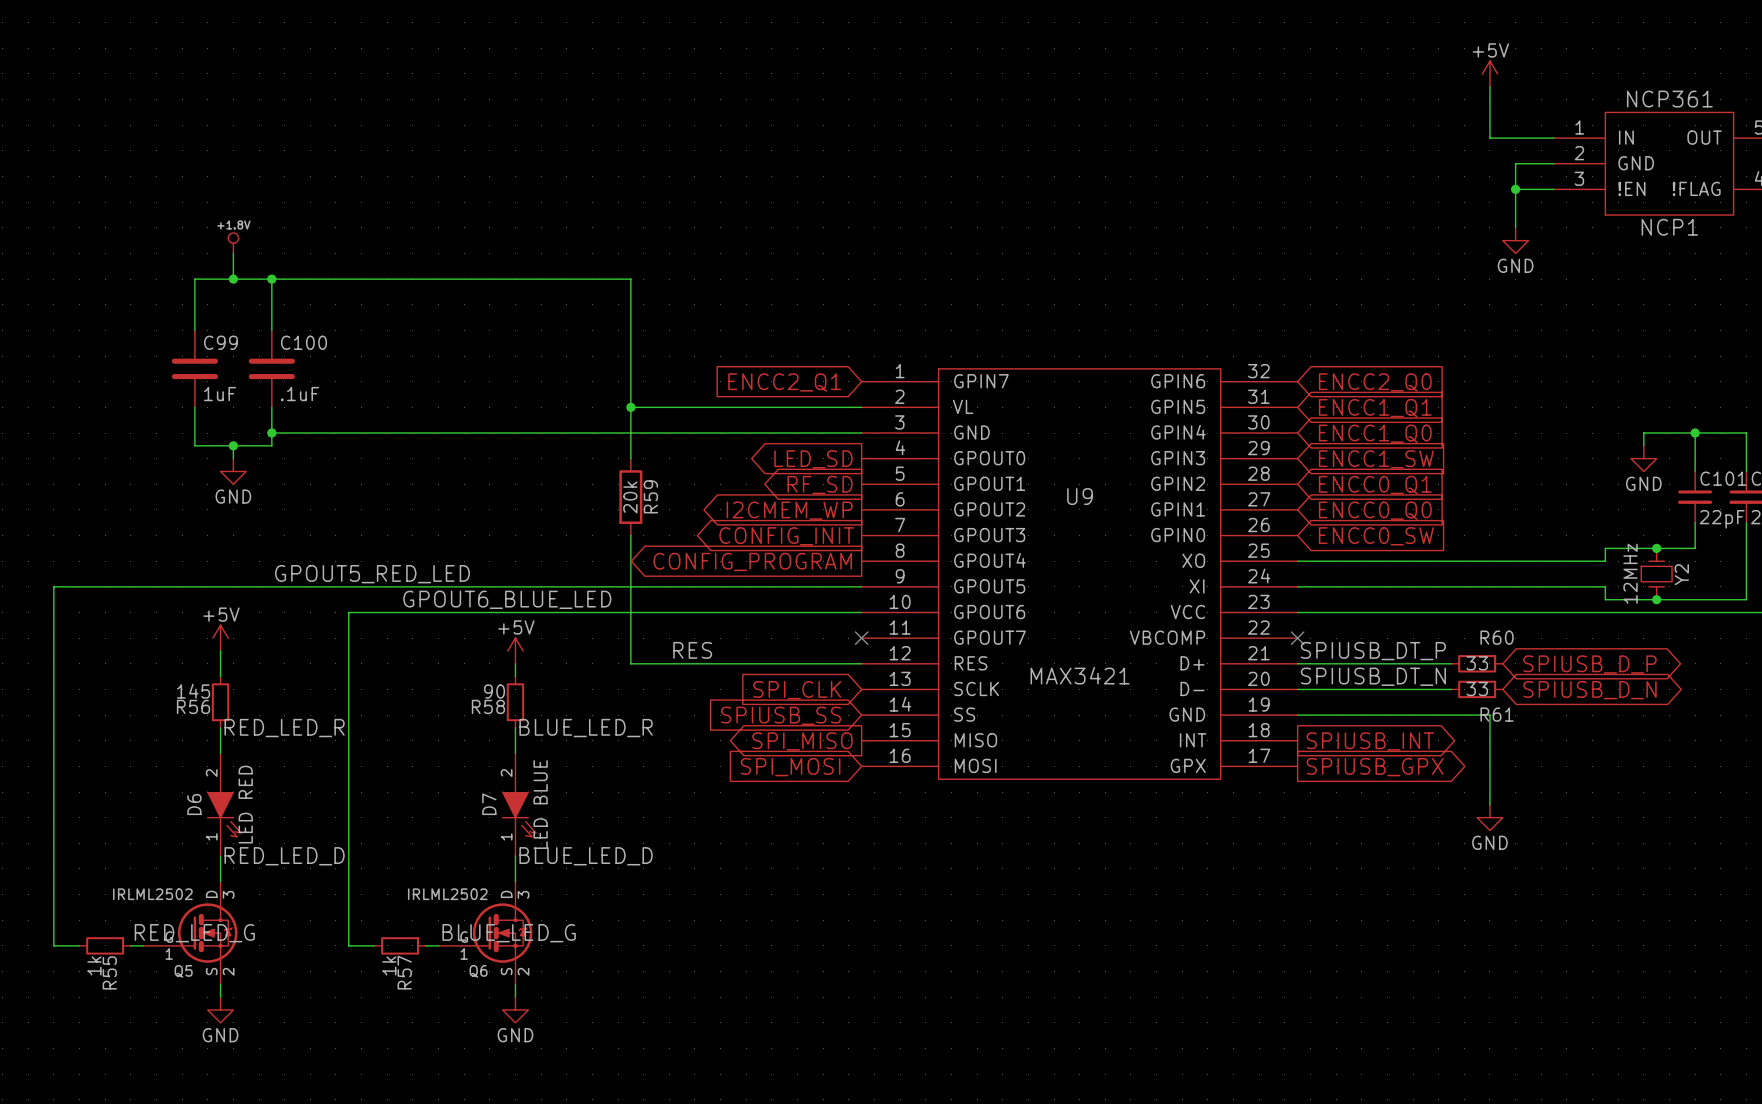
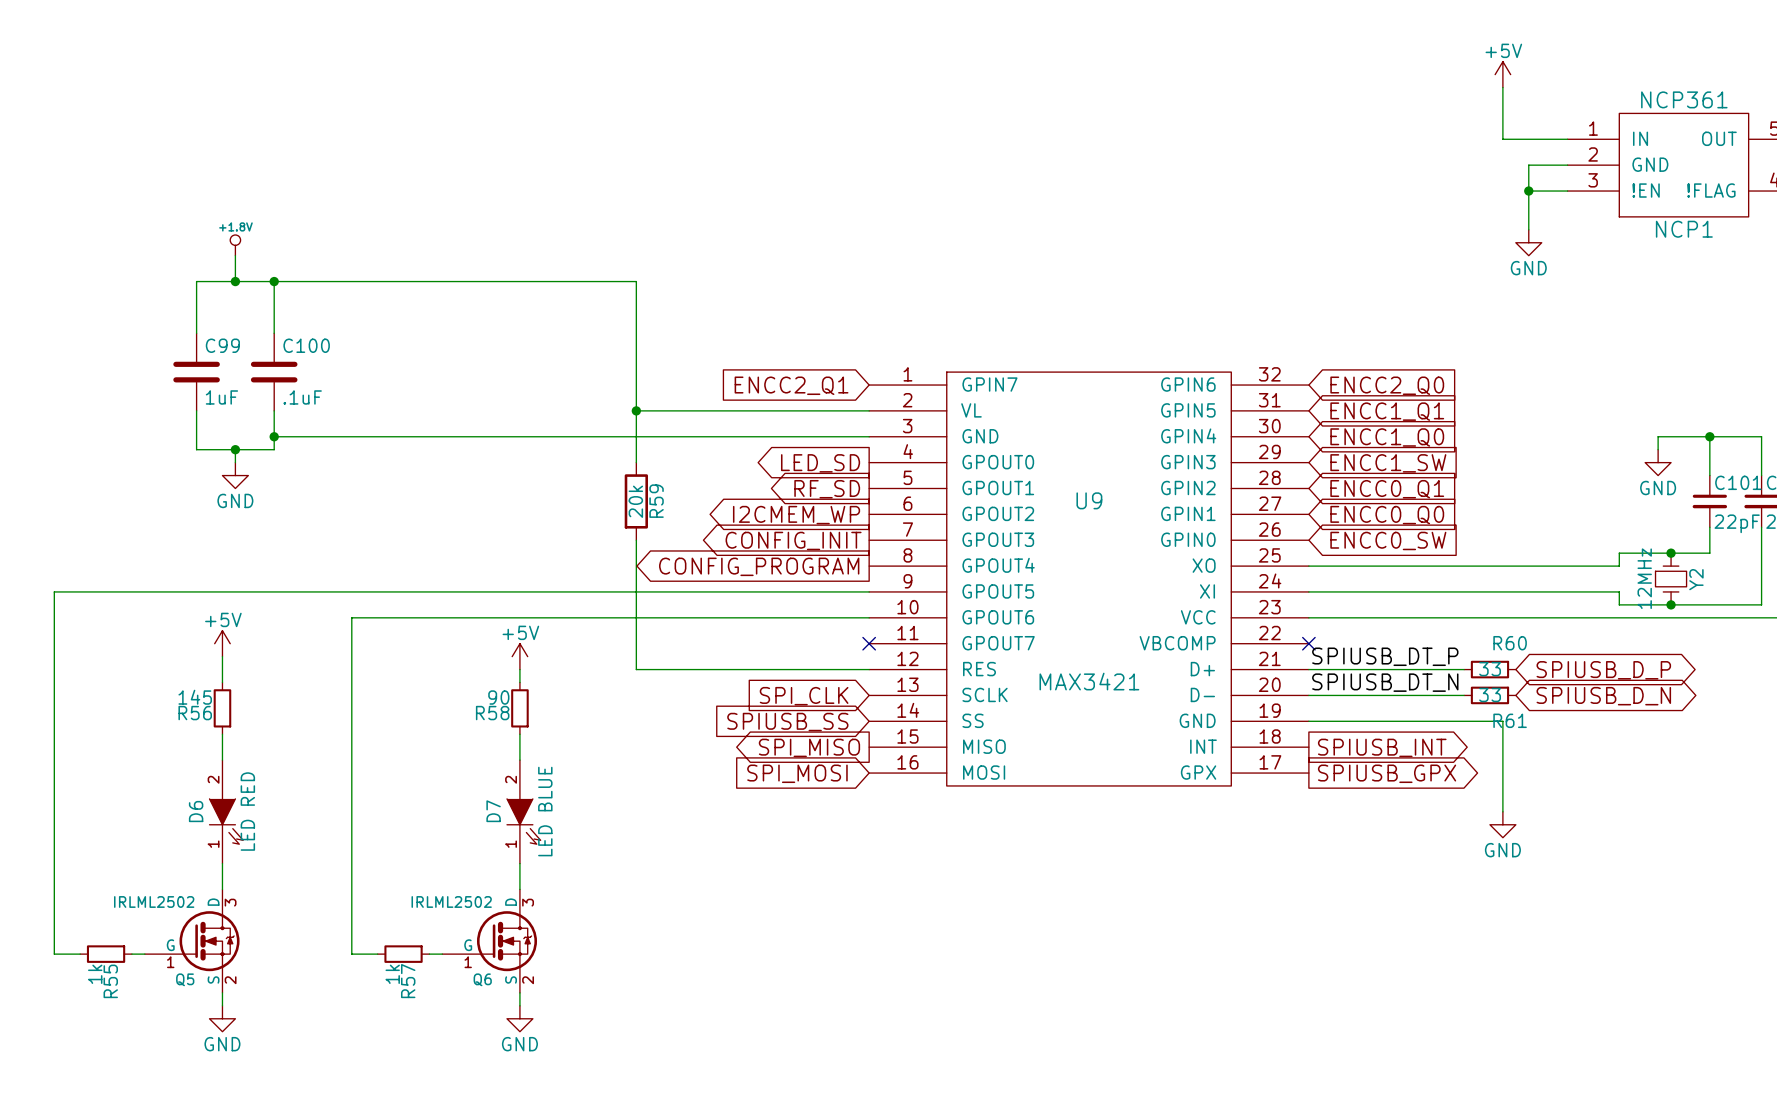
label: GPOUT5_RED_LED (372, 574) -> none
label: GPOUT6_BLUE_LED (507, 599) -> none
label: RES (692, 650) -> none
label: RED_LED_R (284, 728) -> none
label: BLUE_LED_R (586, 728) -> none
label: RED_LED_D (284, 856) -> none
label: BLUE_LED_D (586, 856) -> none
label: RED_LED_G (194, 933) -> none
label: BLUE_LED_G (509, 933) -> none

